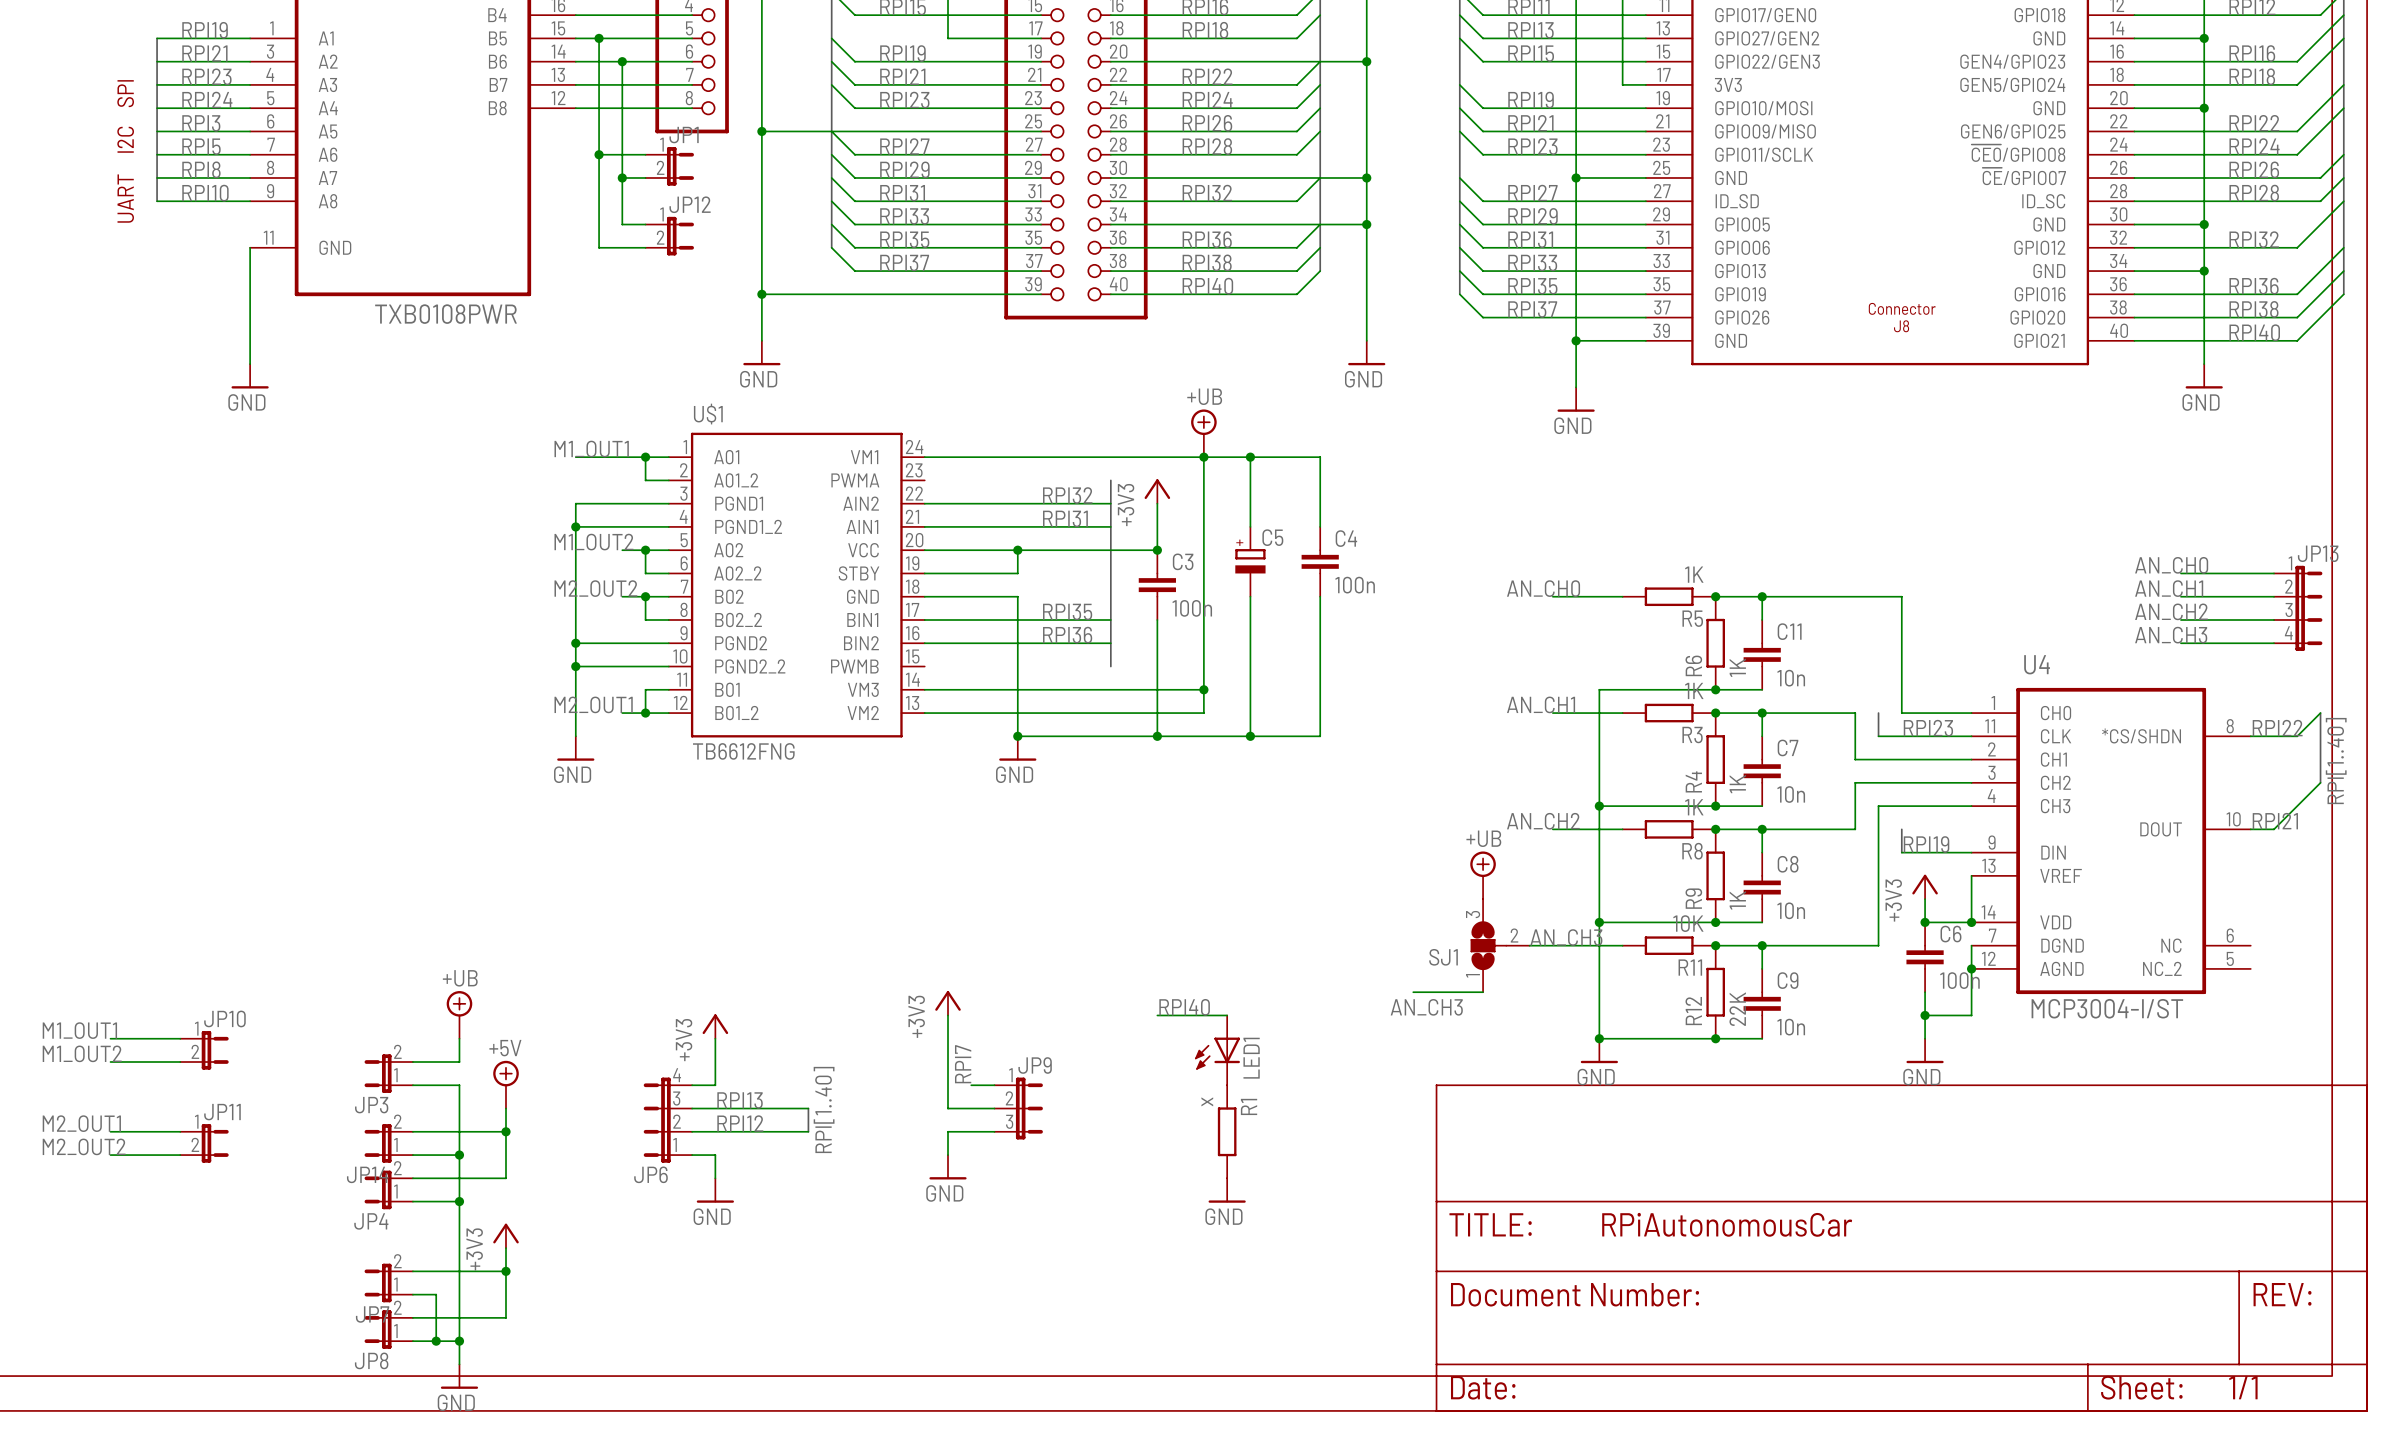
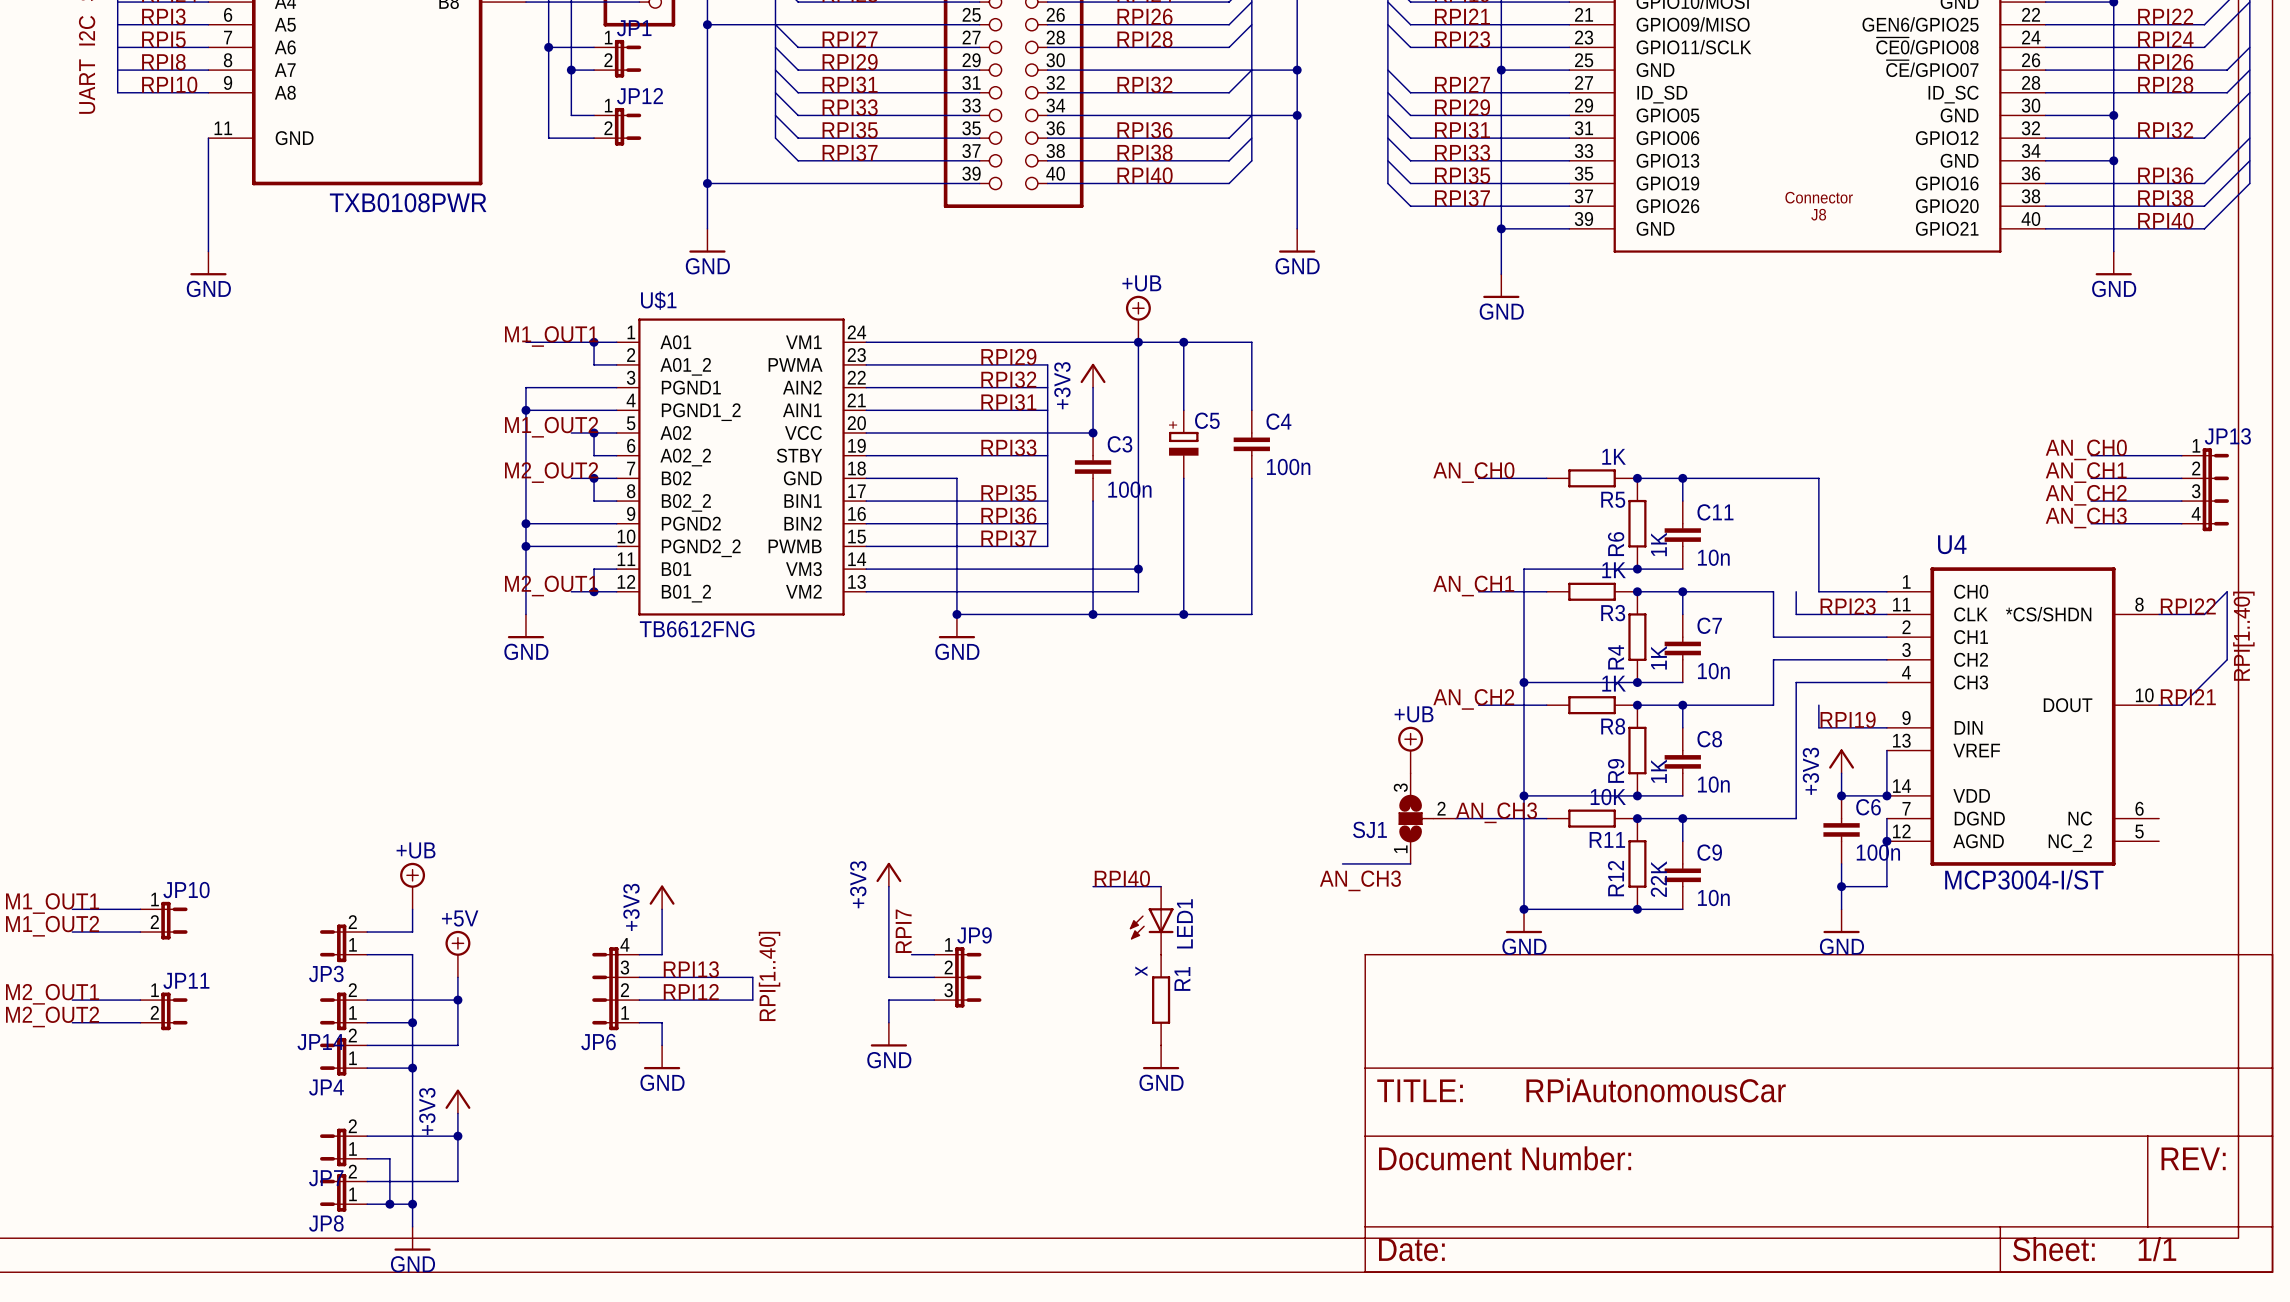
label: none -> RPI29 (1008, 357)
wire: none -> (866, 364) (1047, 364)
wire: (1017, 550) (1017, 573) -> (1047, 455) (956, 455)
junction: (1017, 550) -> none
label: none -> RPI33 (1008, 447)
label: none -> RPI37 (1008, 538)
wire: none -> (866, 546) (1047, 546)

